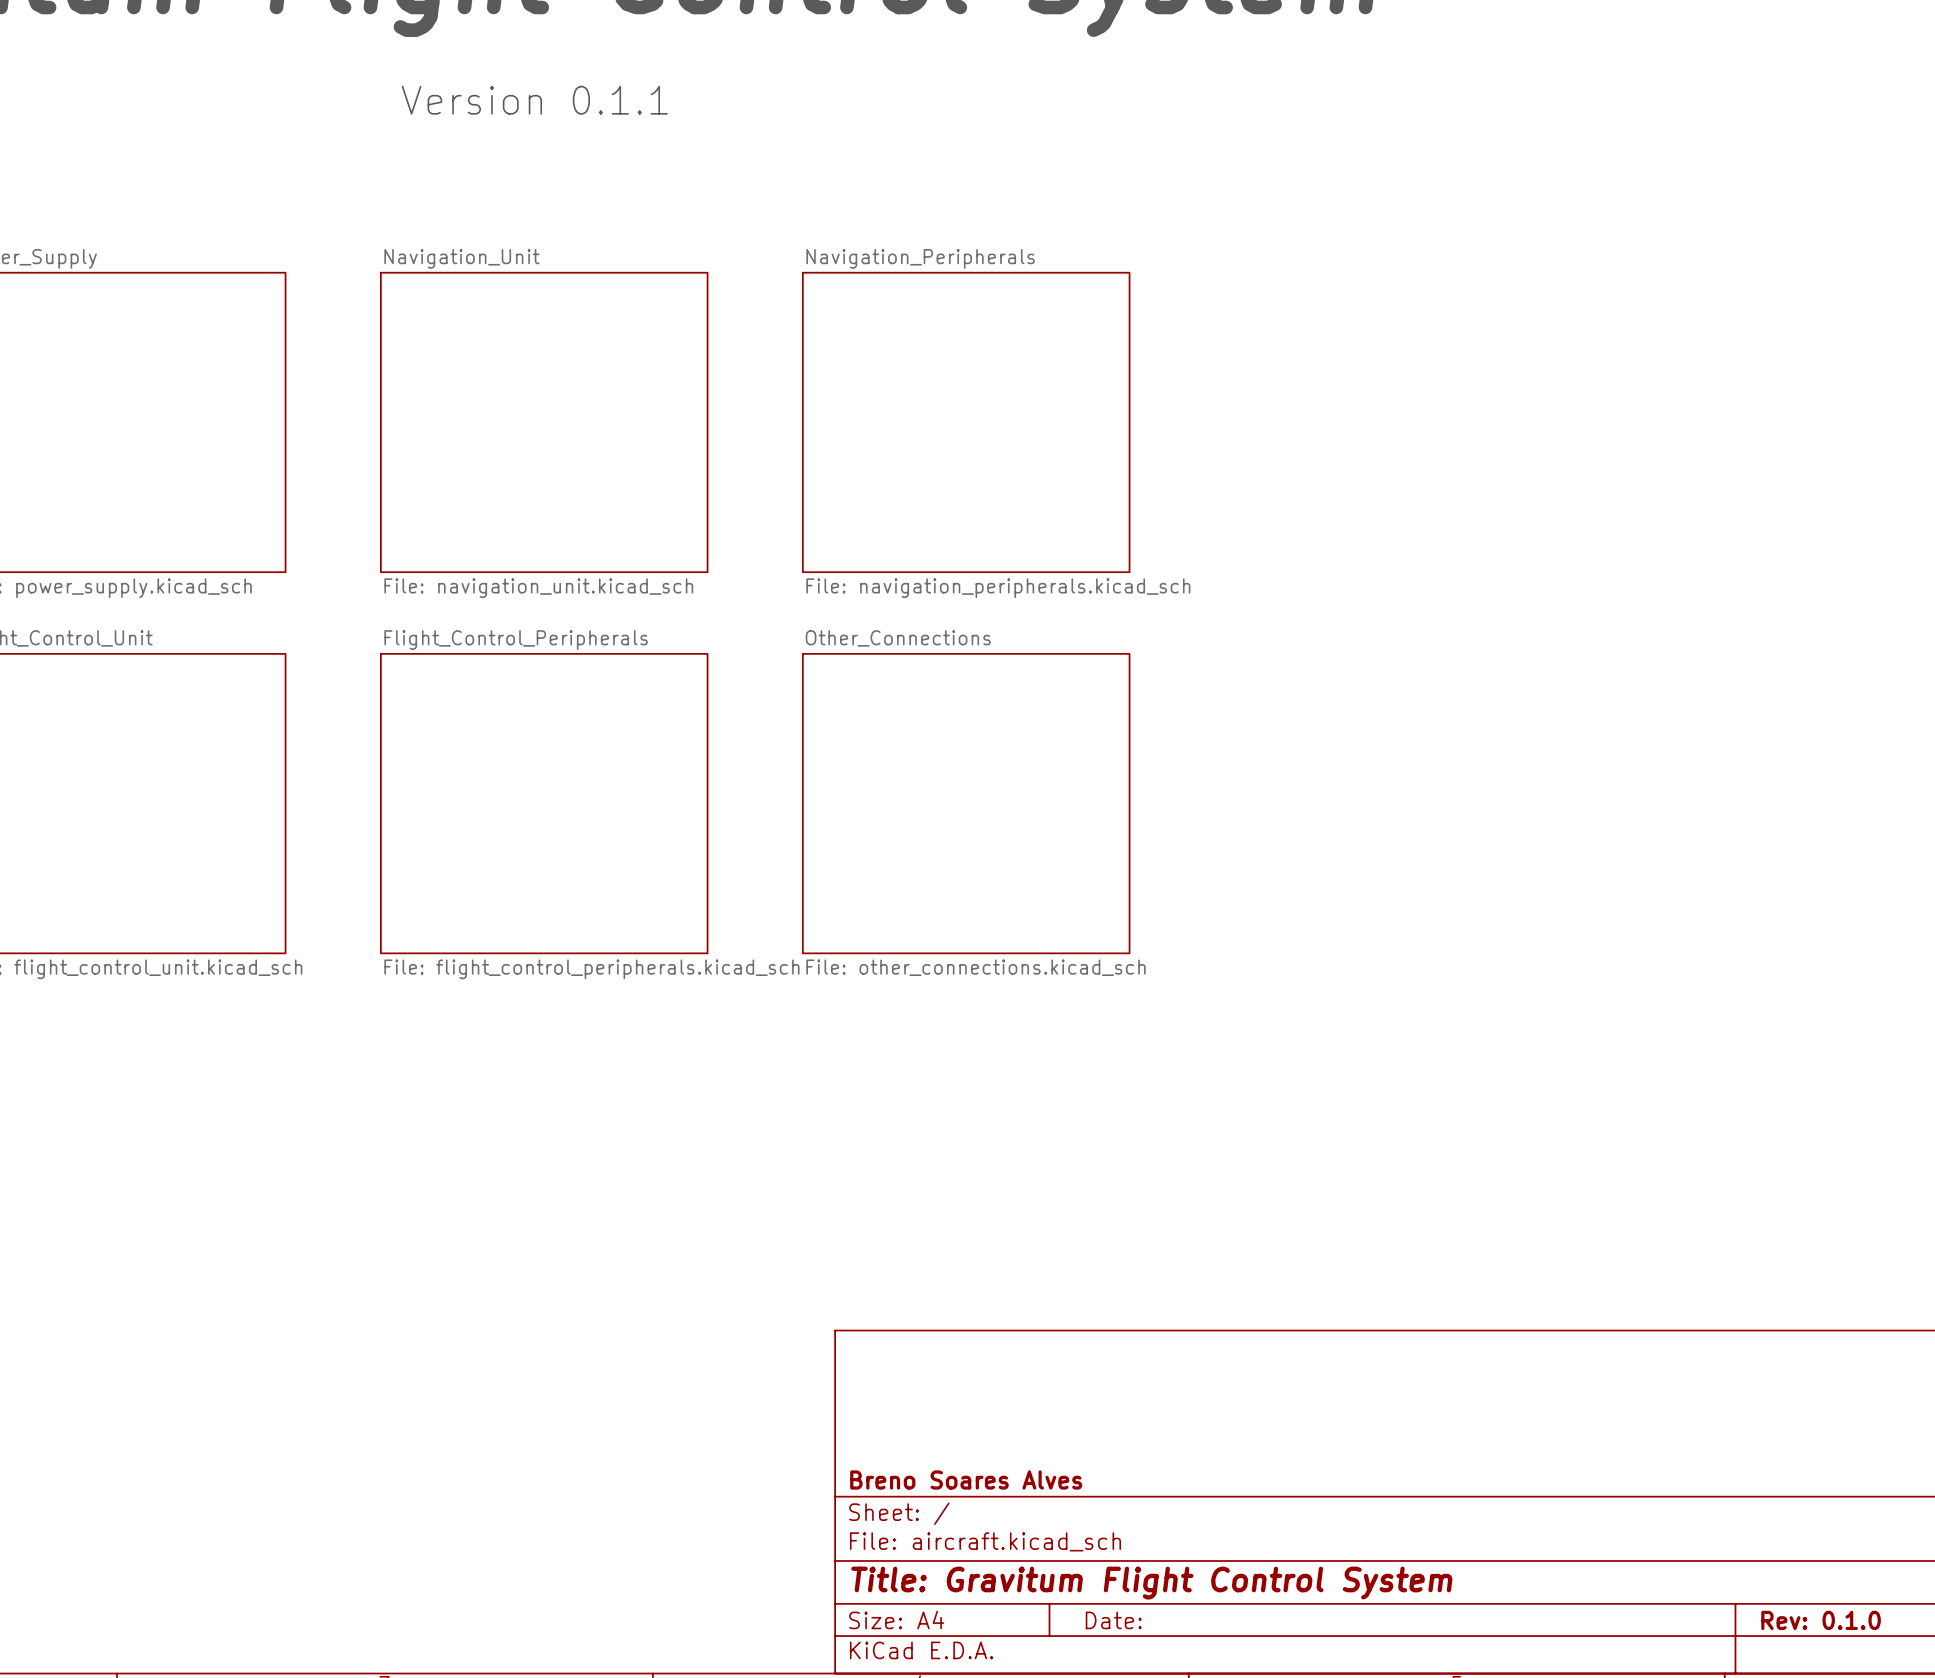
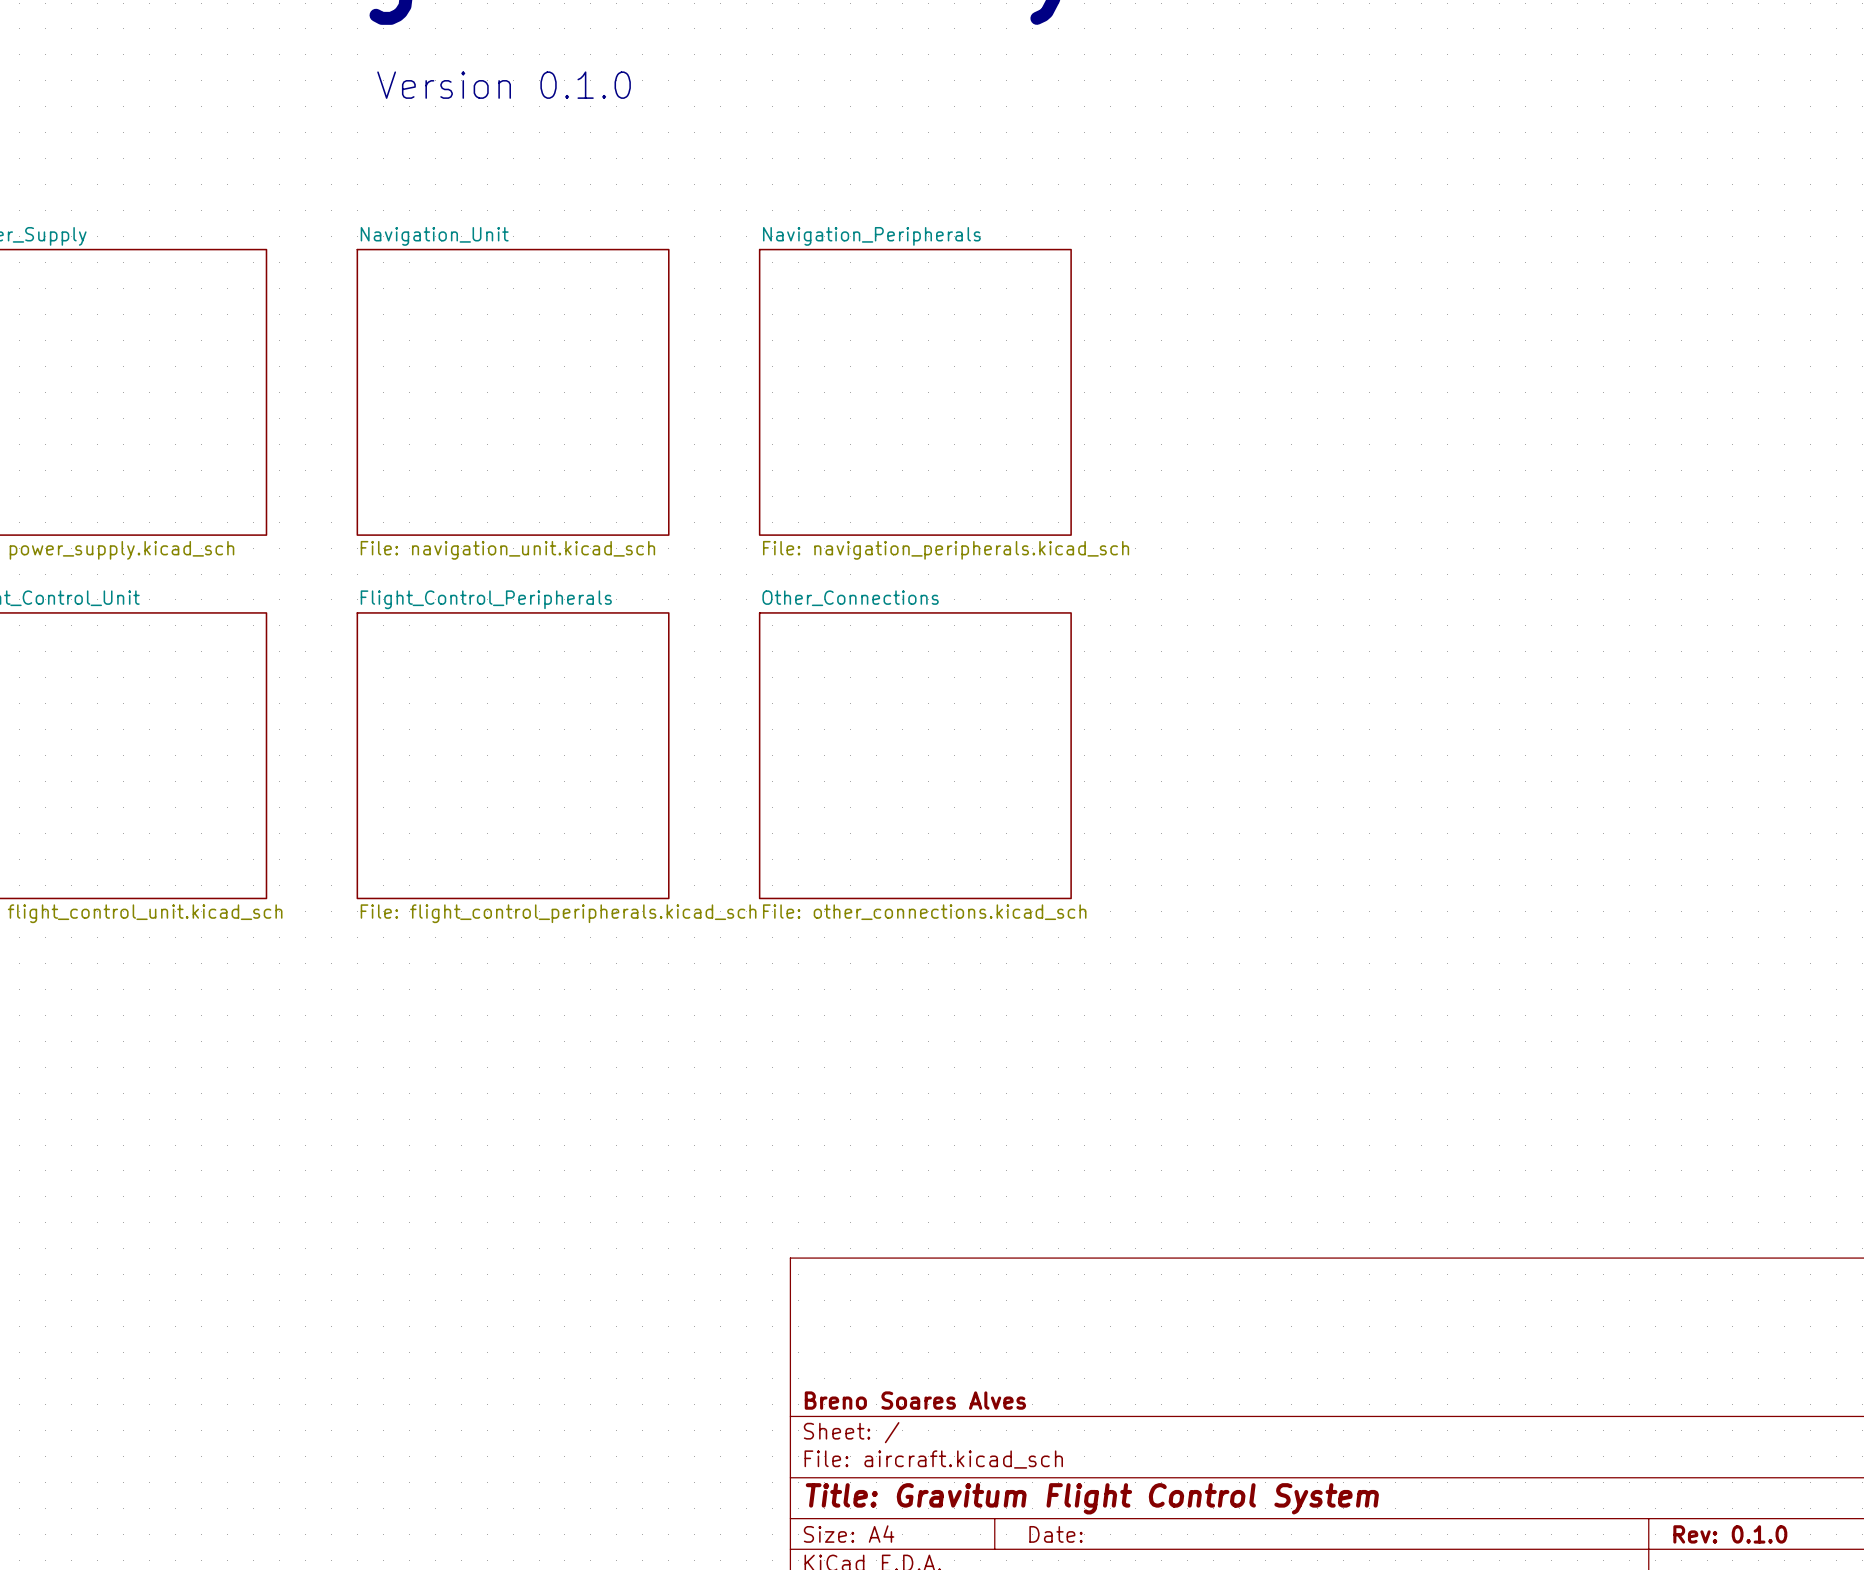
text: Version 0.1.1 (534, 100) -> Version 0.1.0 (504, 85)

